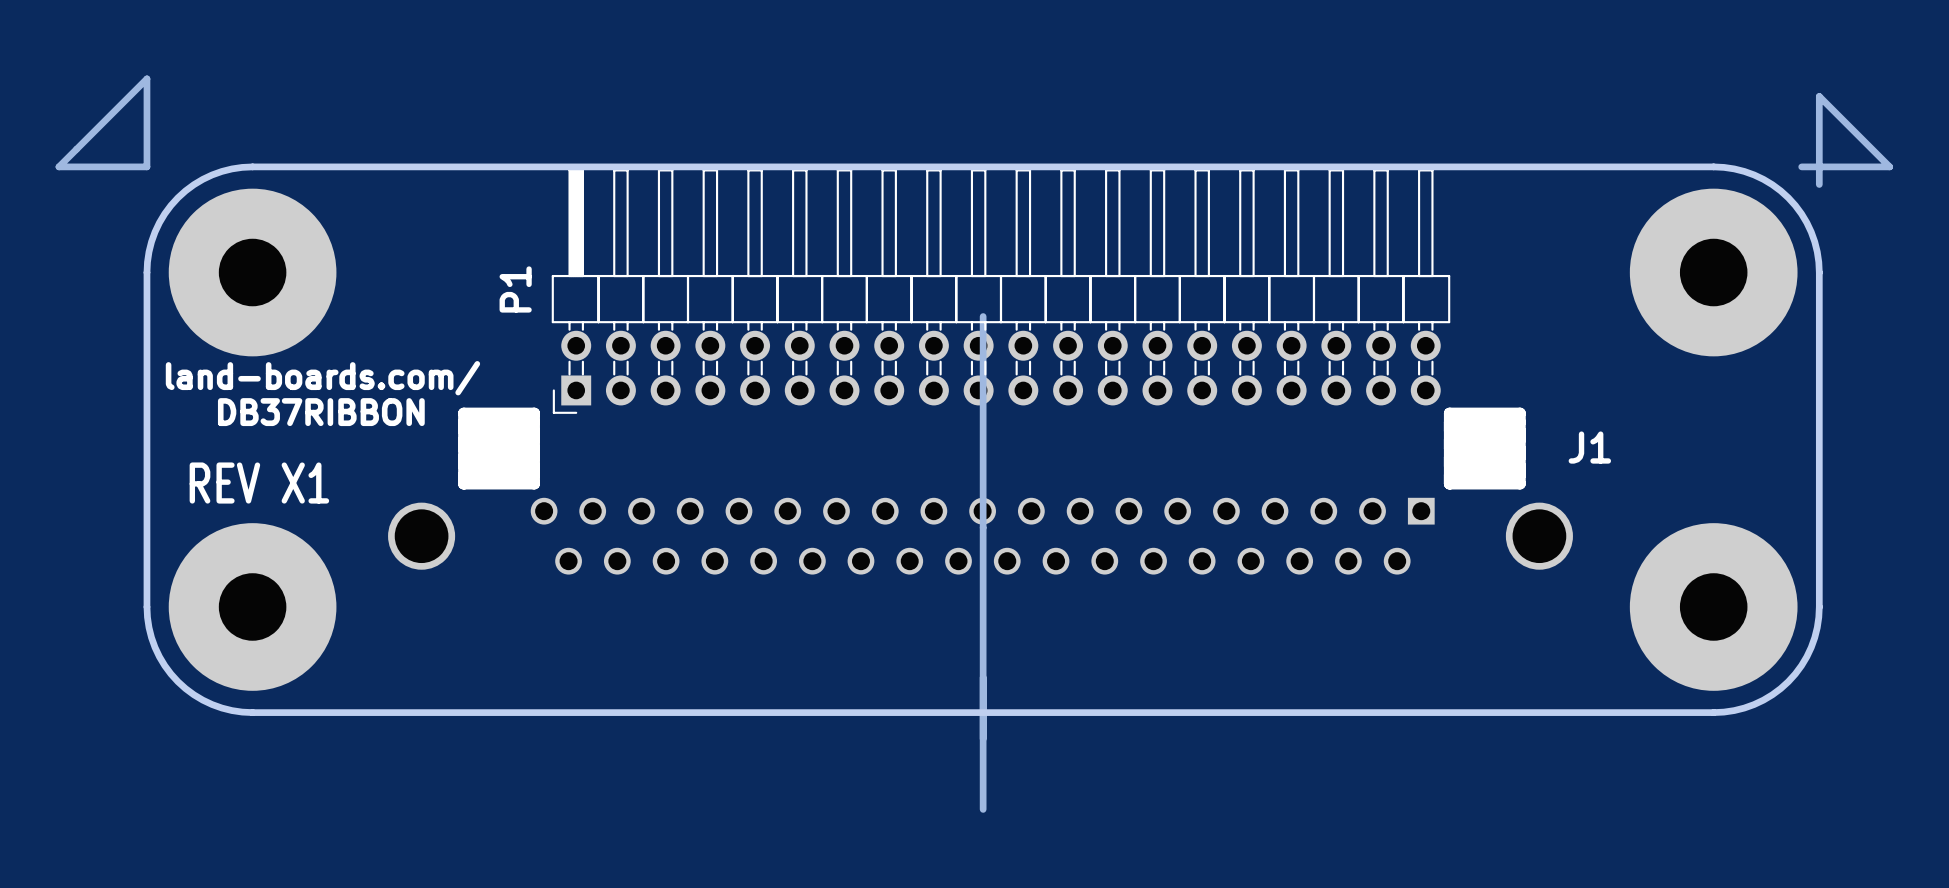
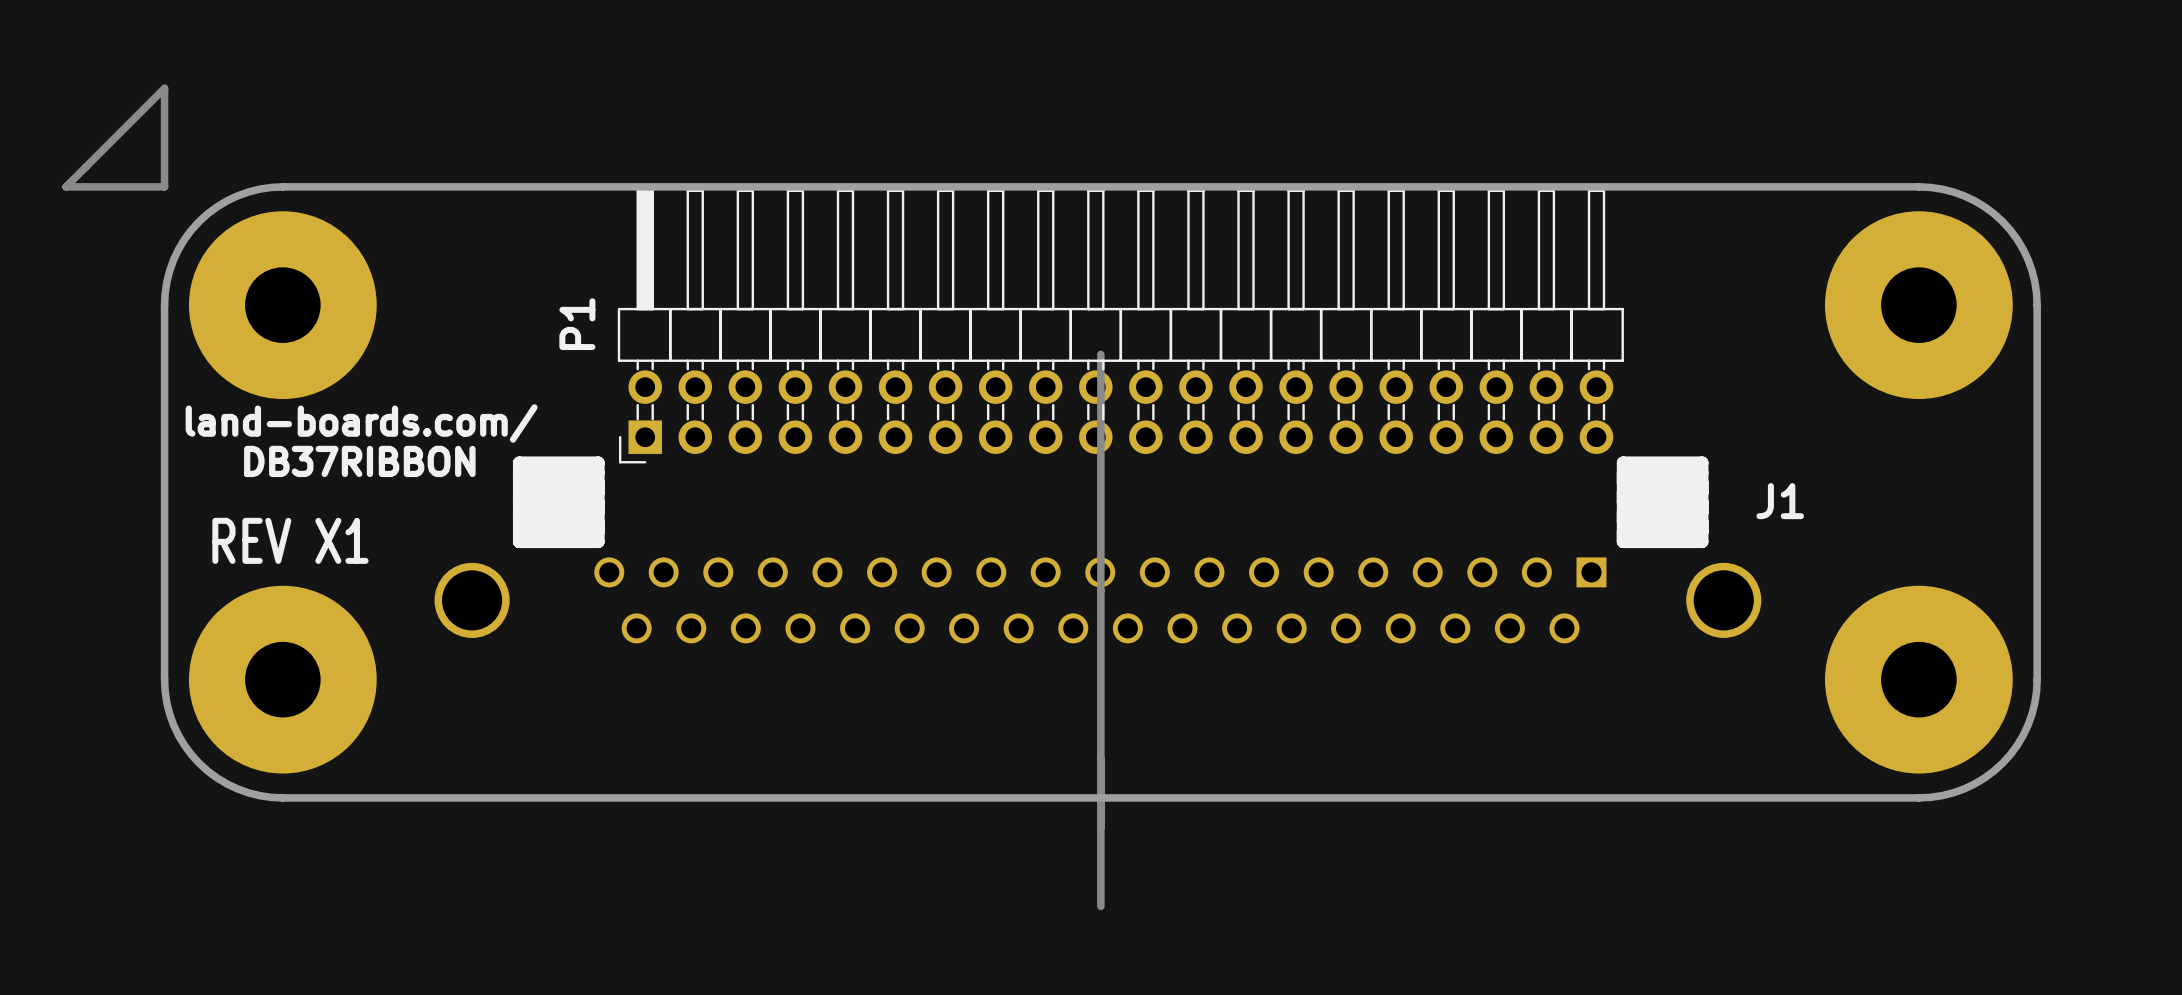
line: (1801, 166) (1889, 166) (1819, 96) (1819, 184) -> none

